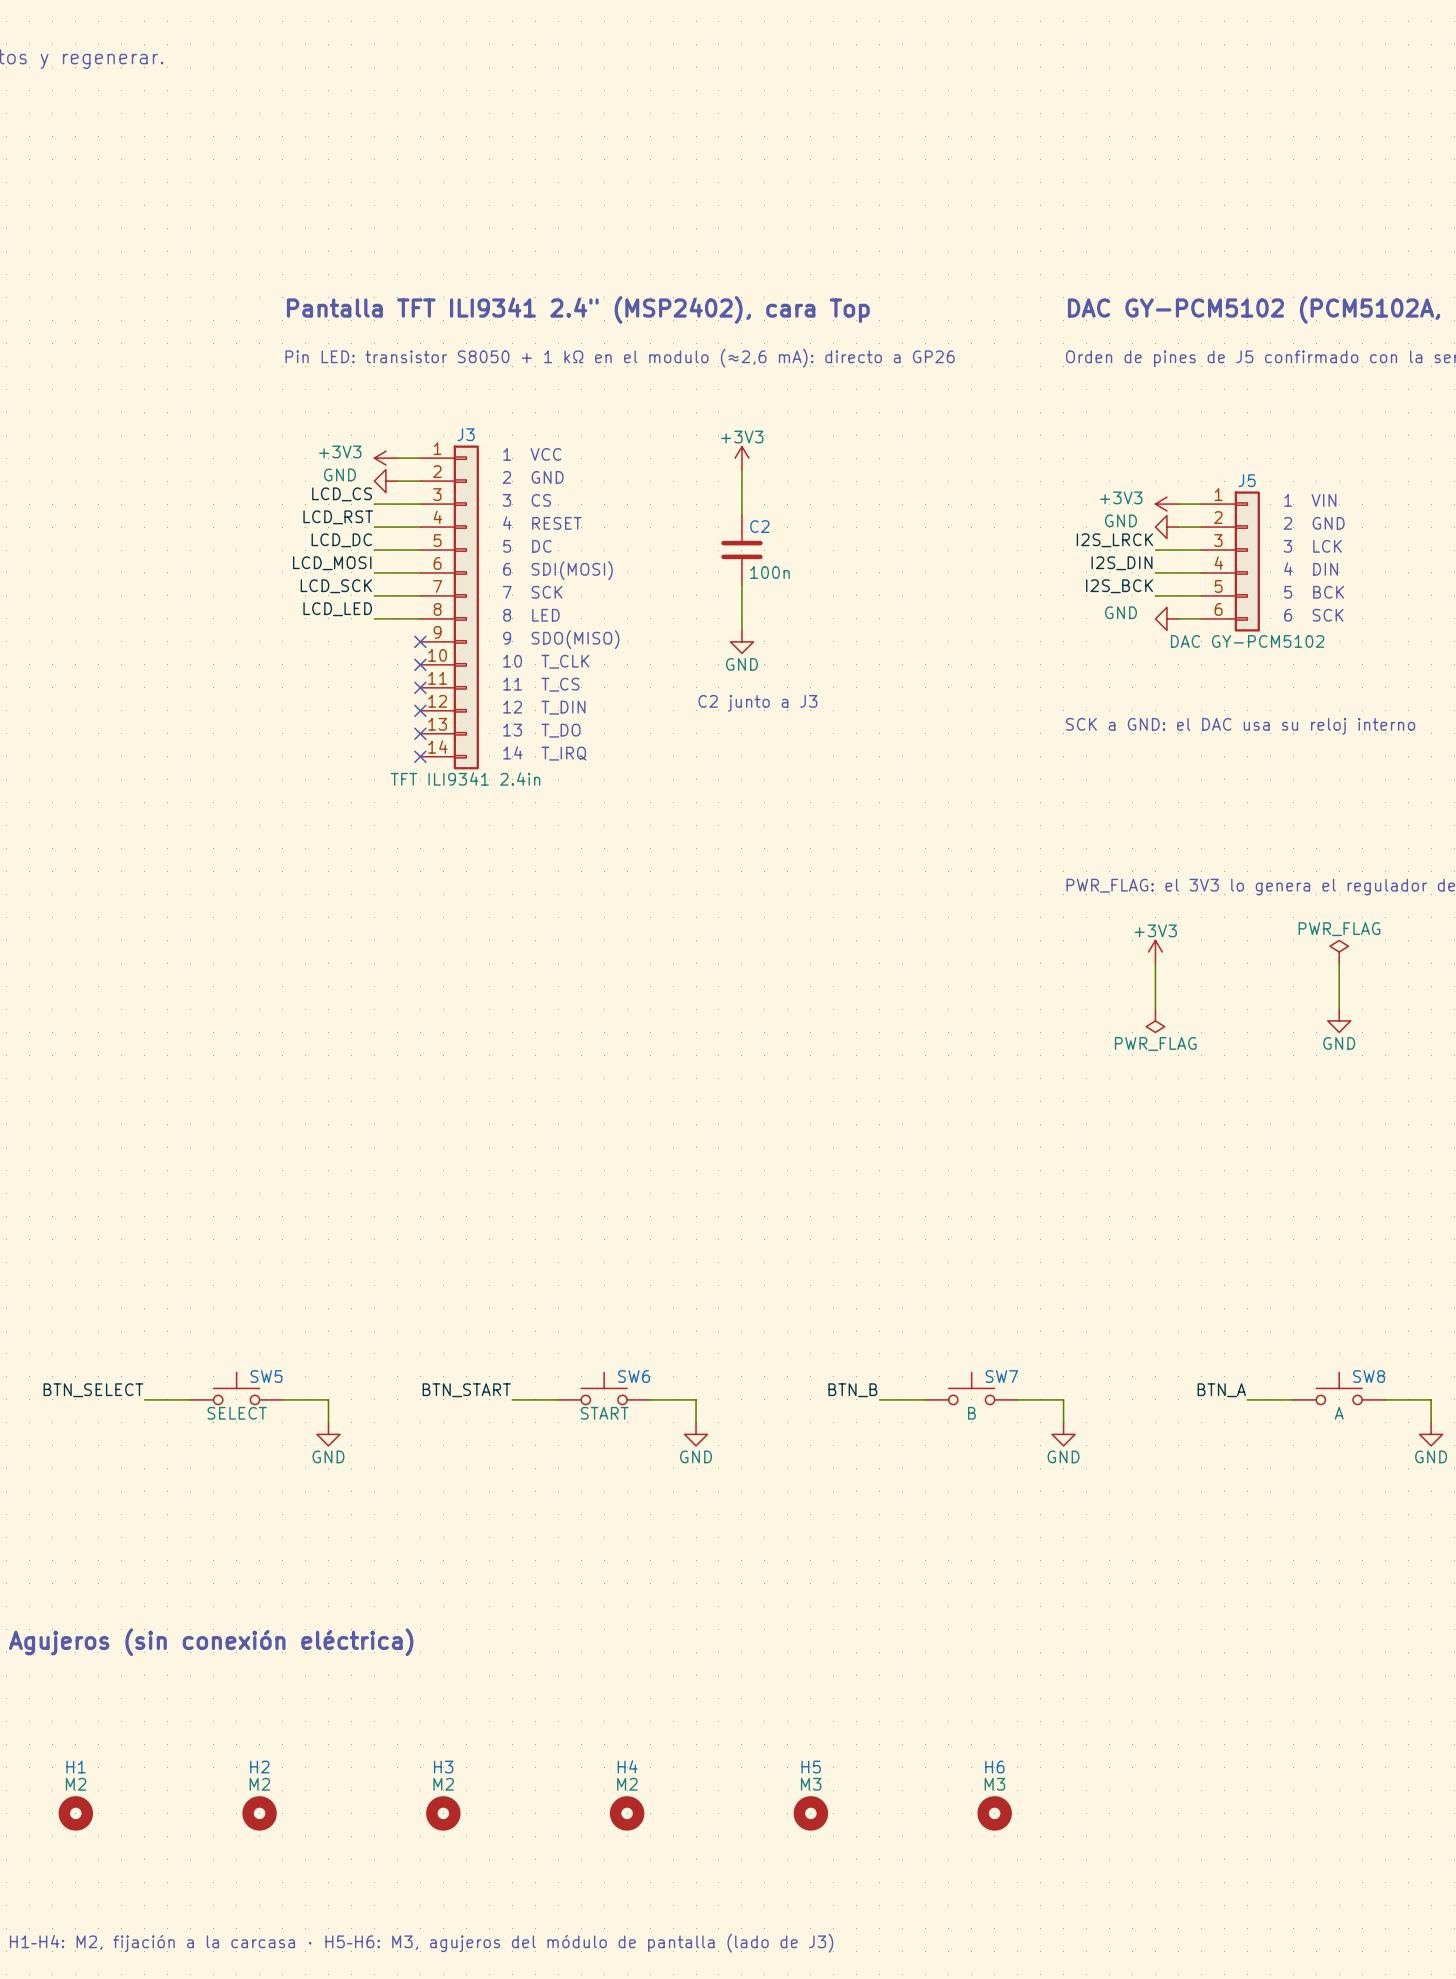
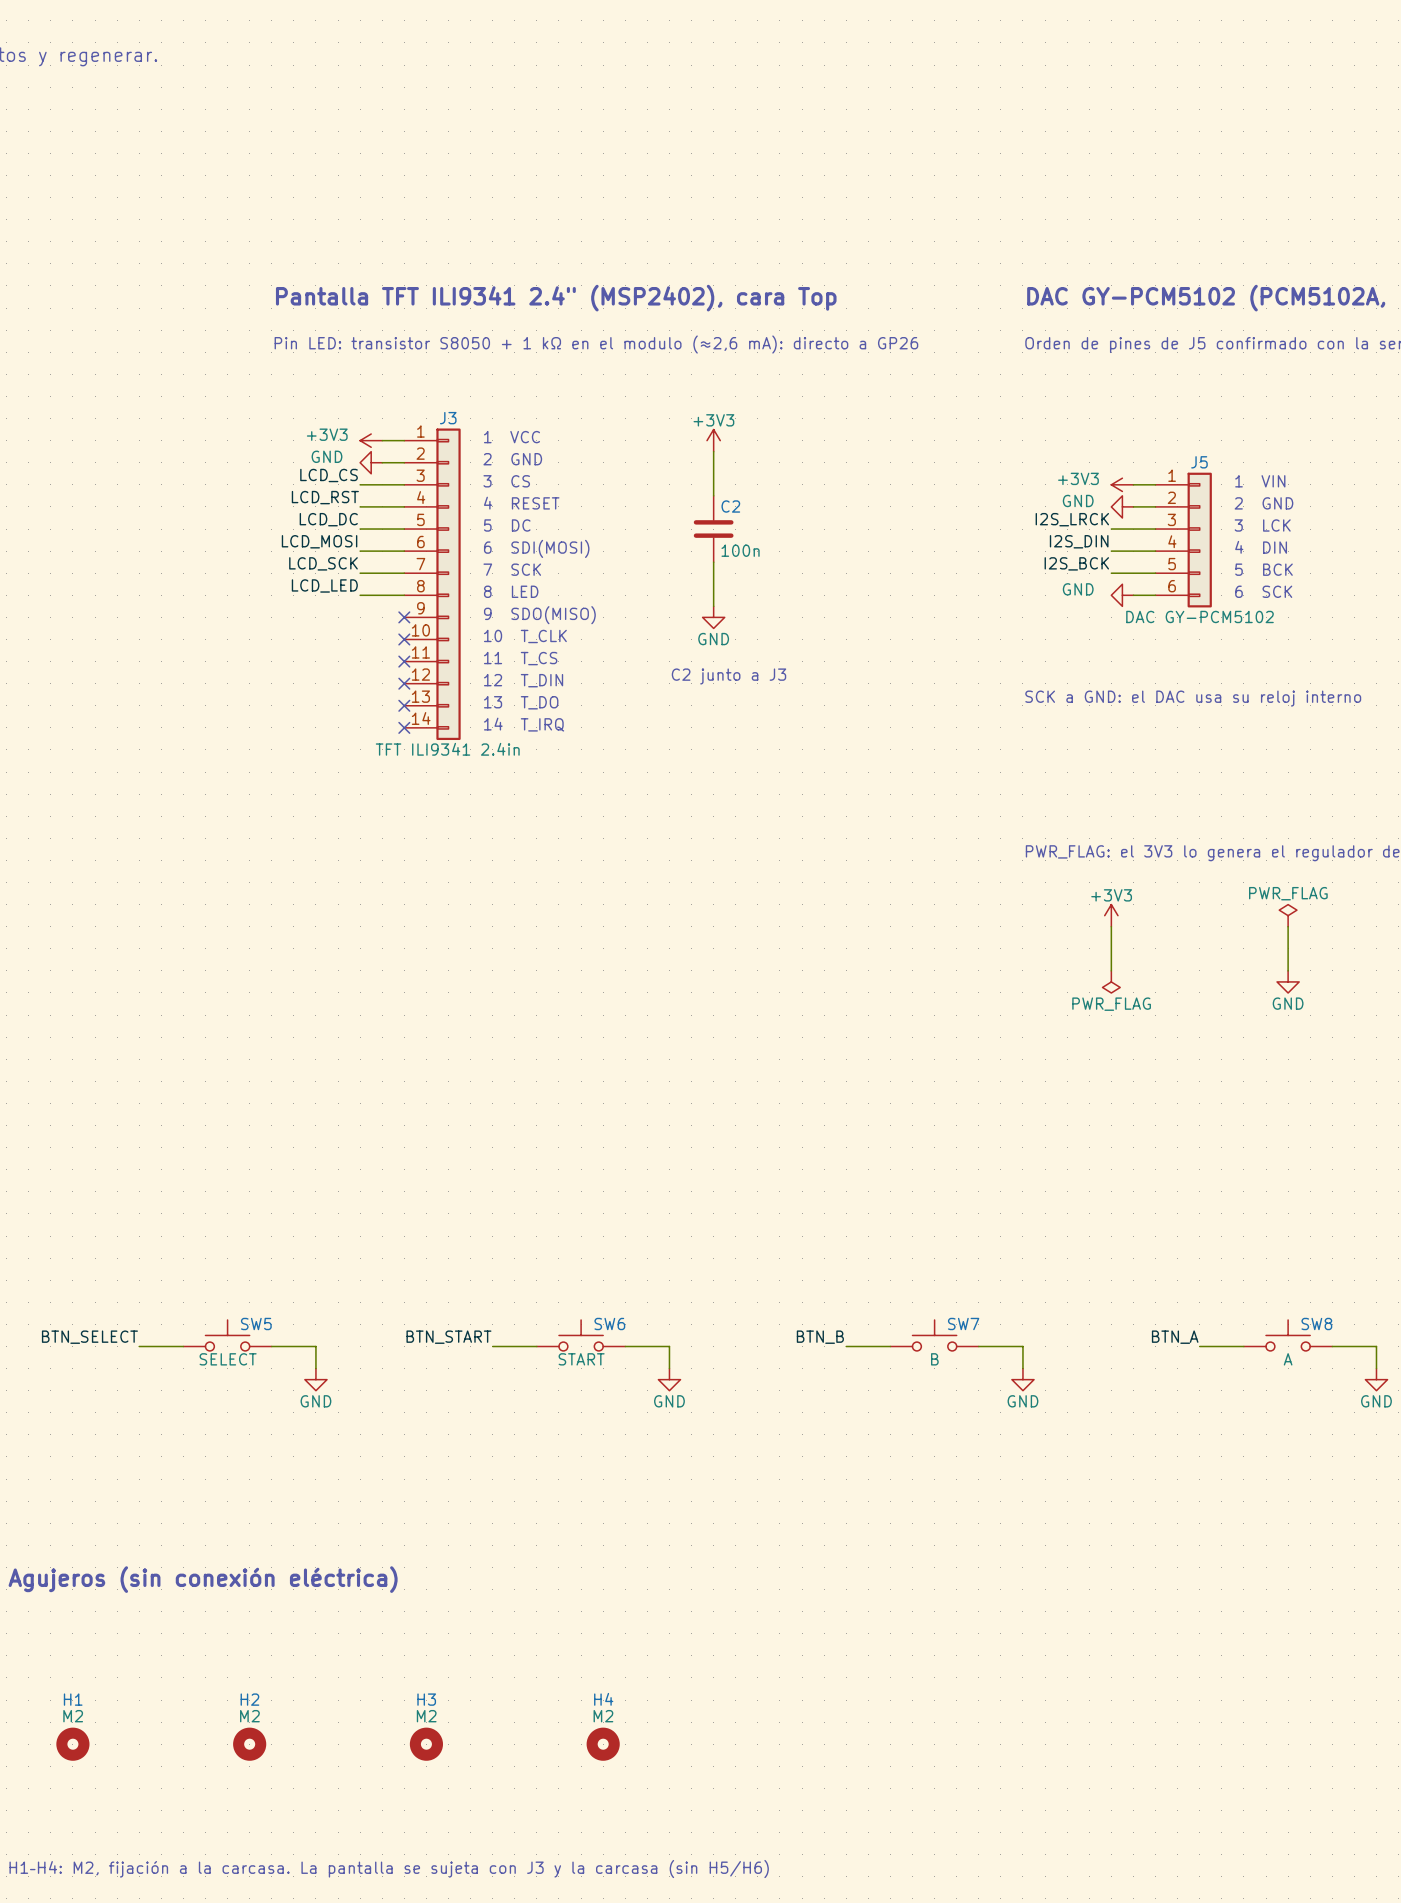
H5: M3 (810, 1813) -> none
H6: M3 (994, 1813) -> none
text: H1–H4: M2, fijación a la carcasa · H5–H6: M3, agujeros del módulo de pantalla (lado de J3) (421, 1943) -> H1–H4: M2, fijación a la carcasa. La pantalla se sujeta con J3 y la carcasa (sin H5/H6) (389, 1869)

